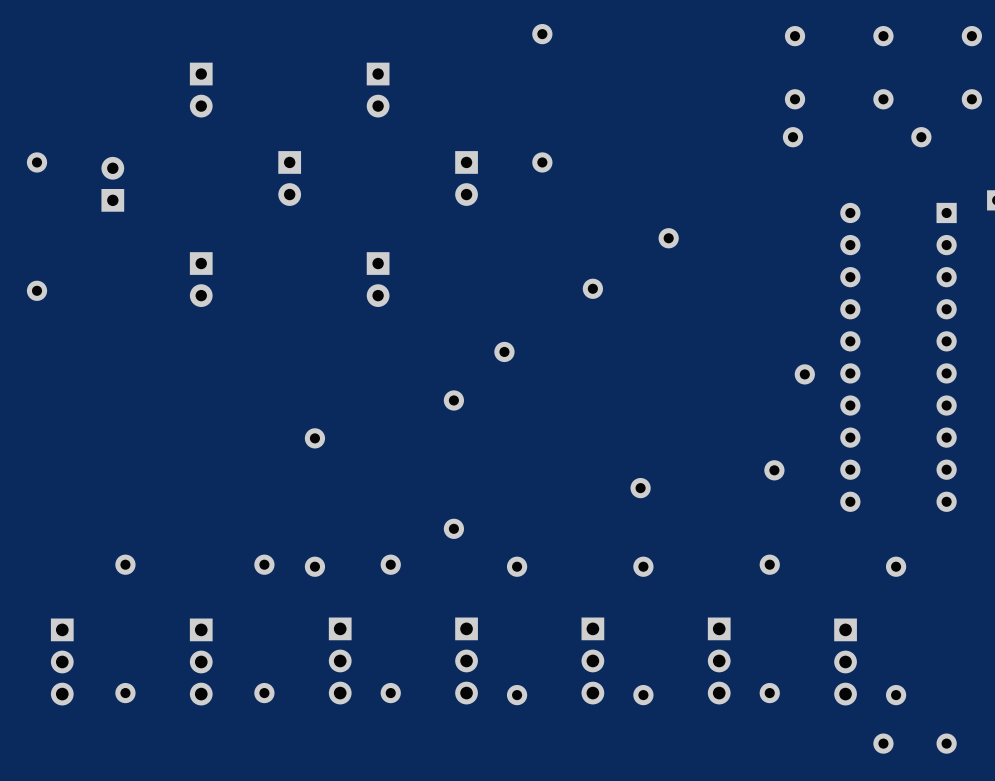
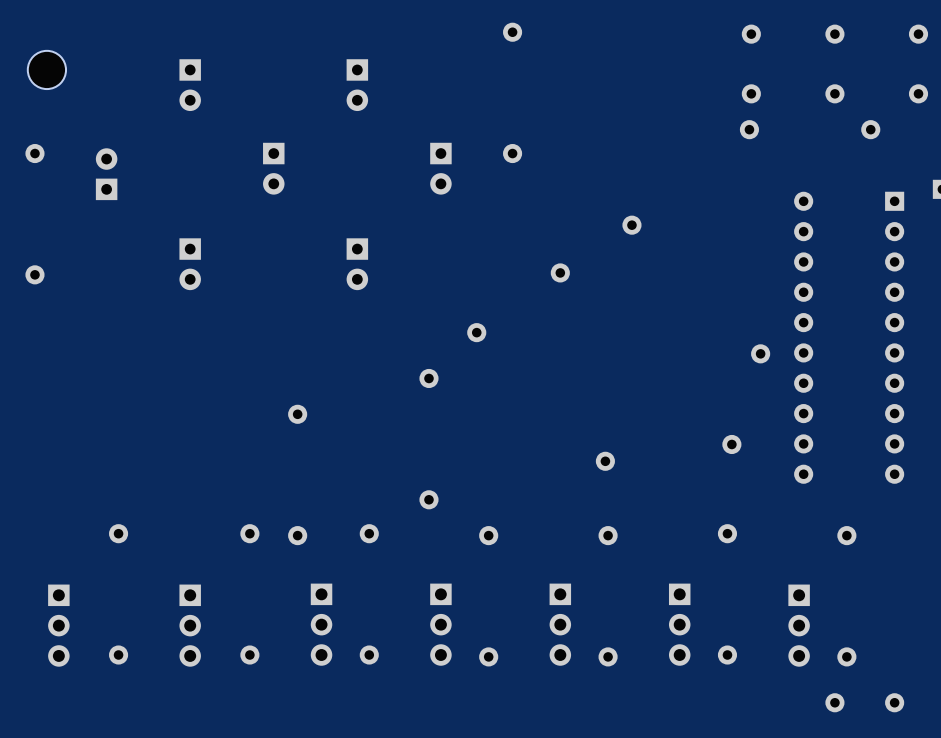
part: none -> (46, 69)

